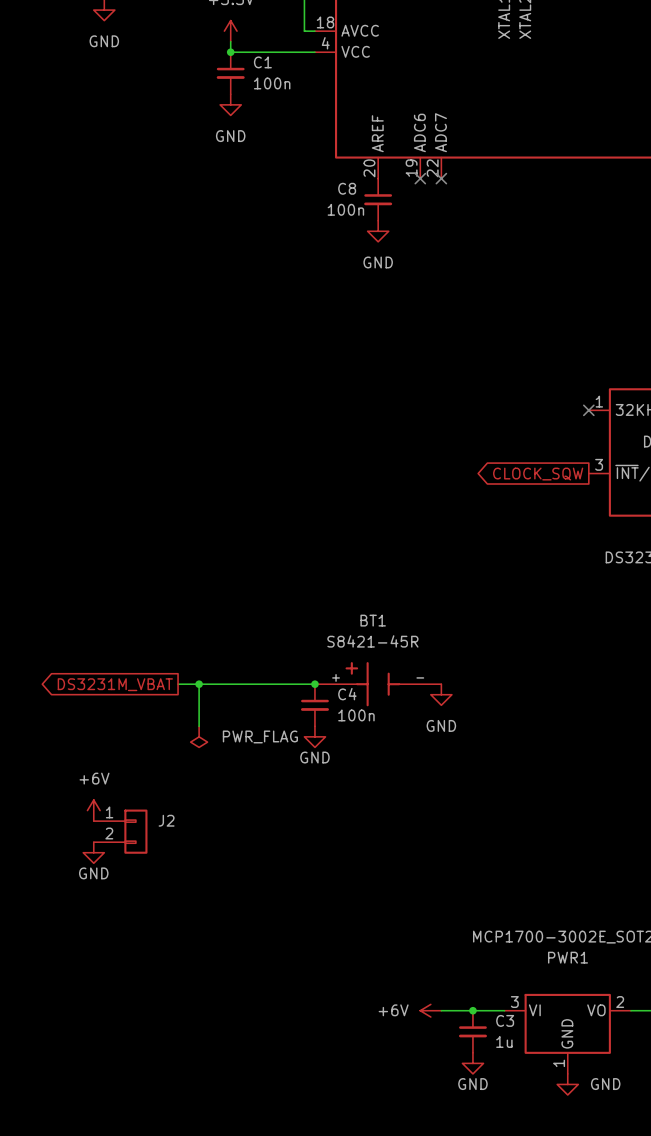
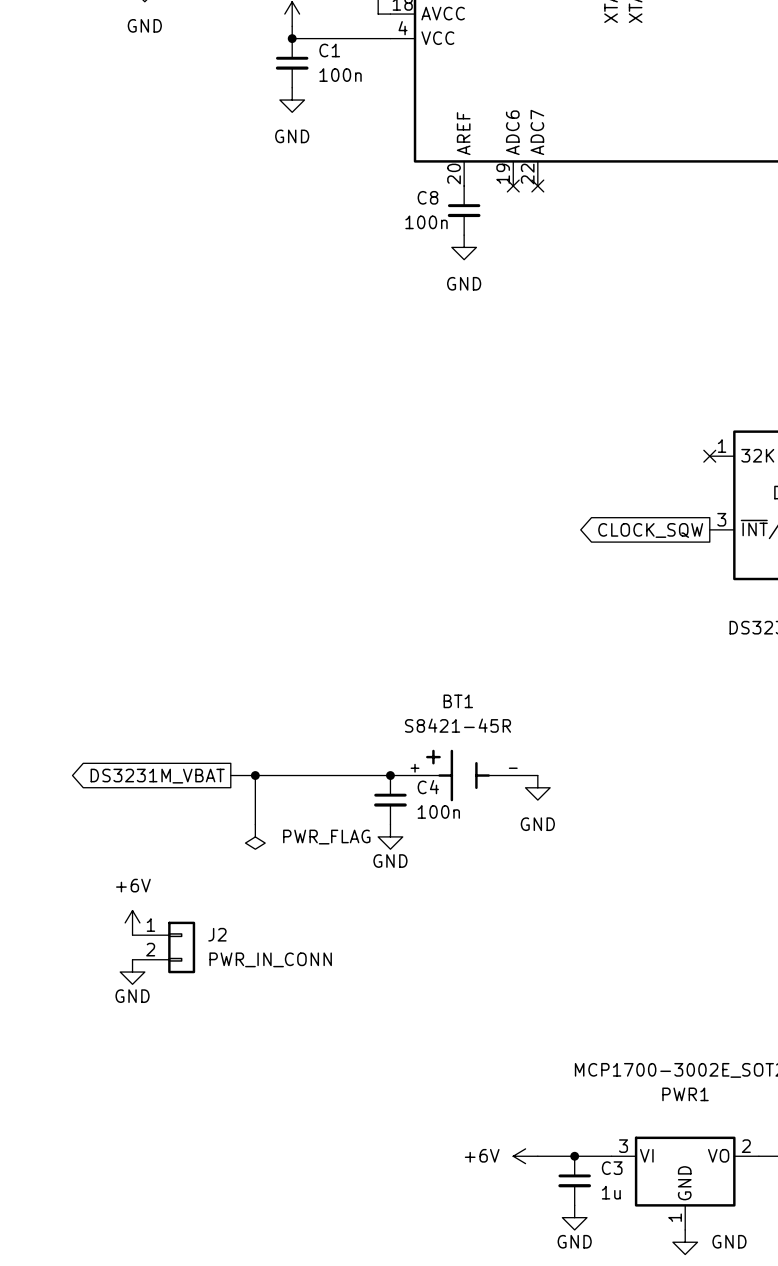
J2 value: none -> PWR_IN_CONN (270, 959)

